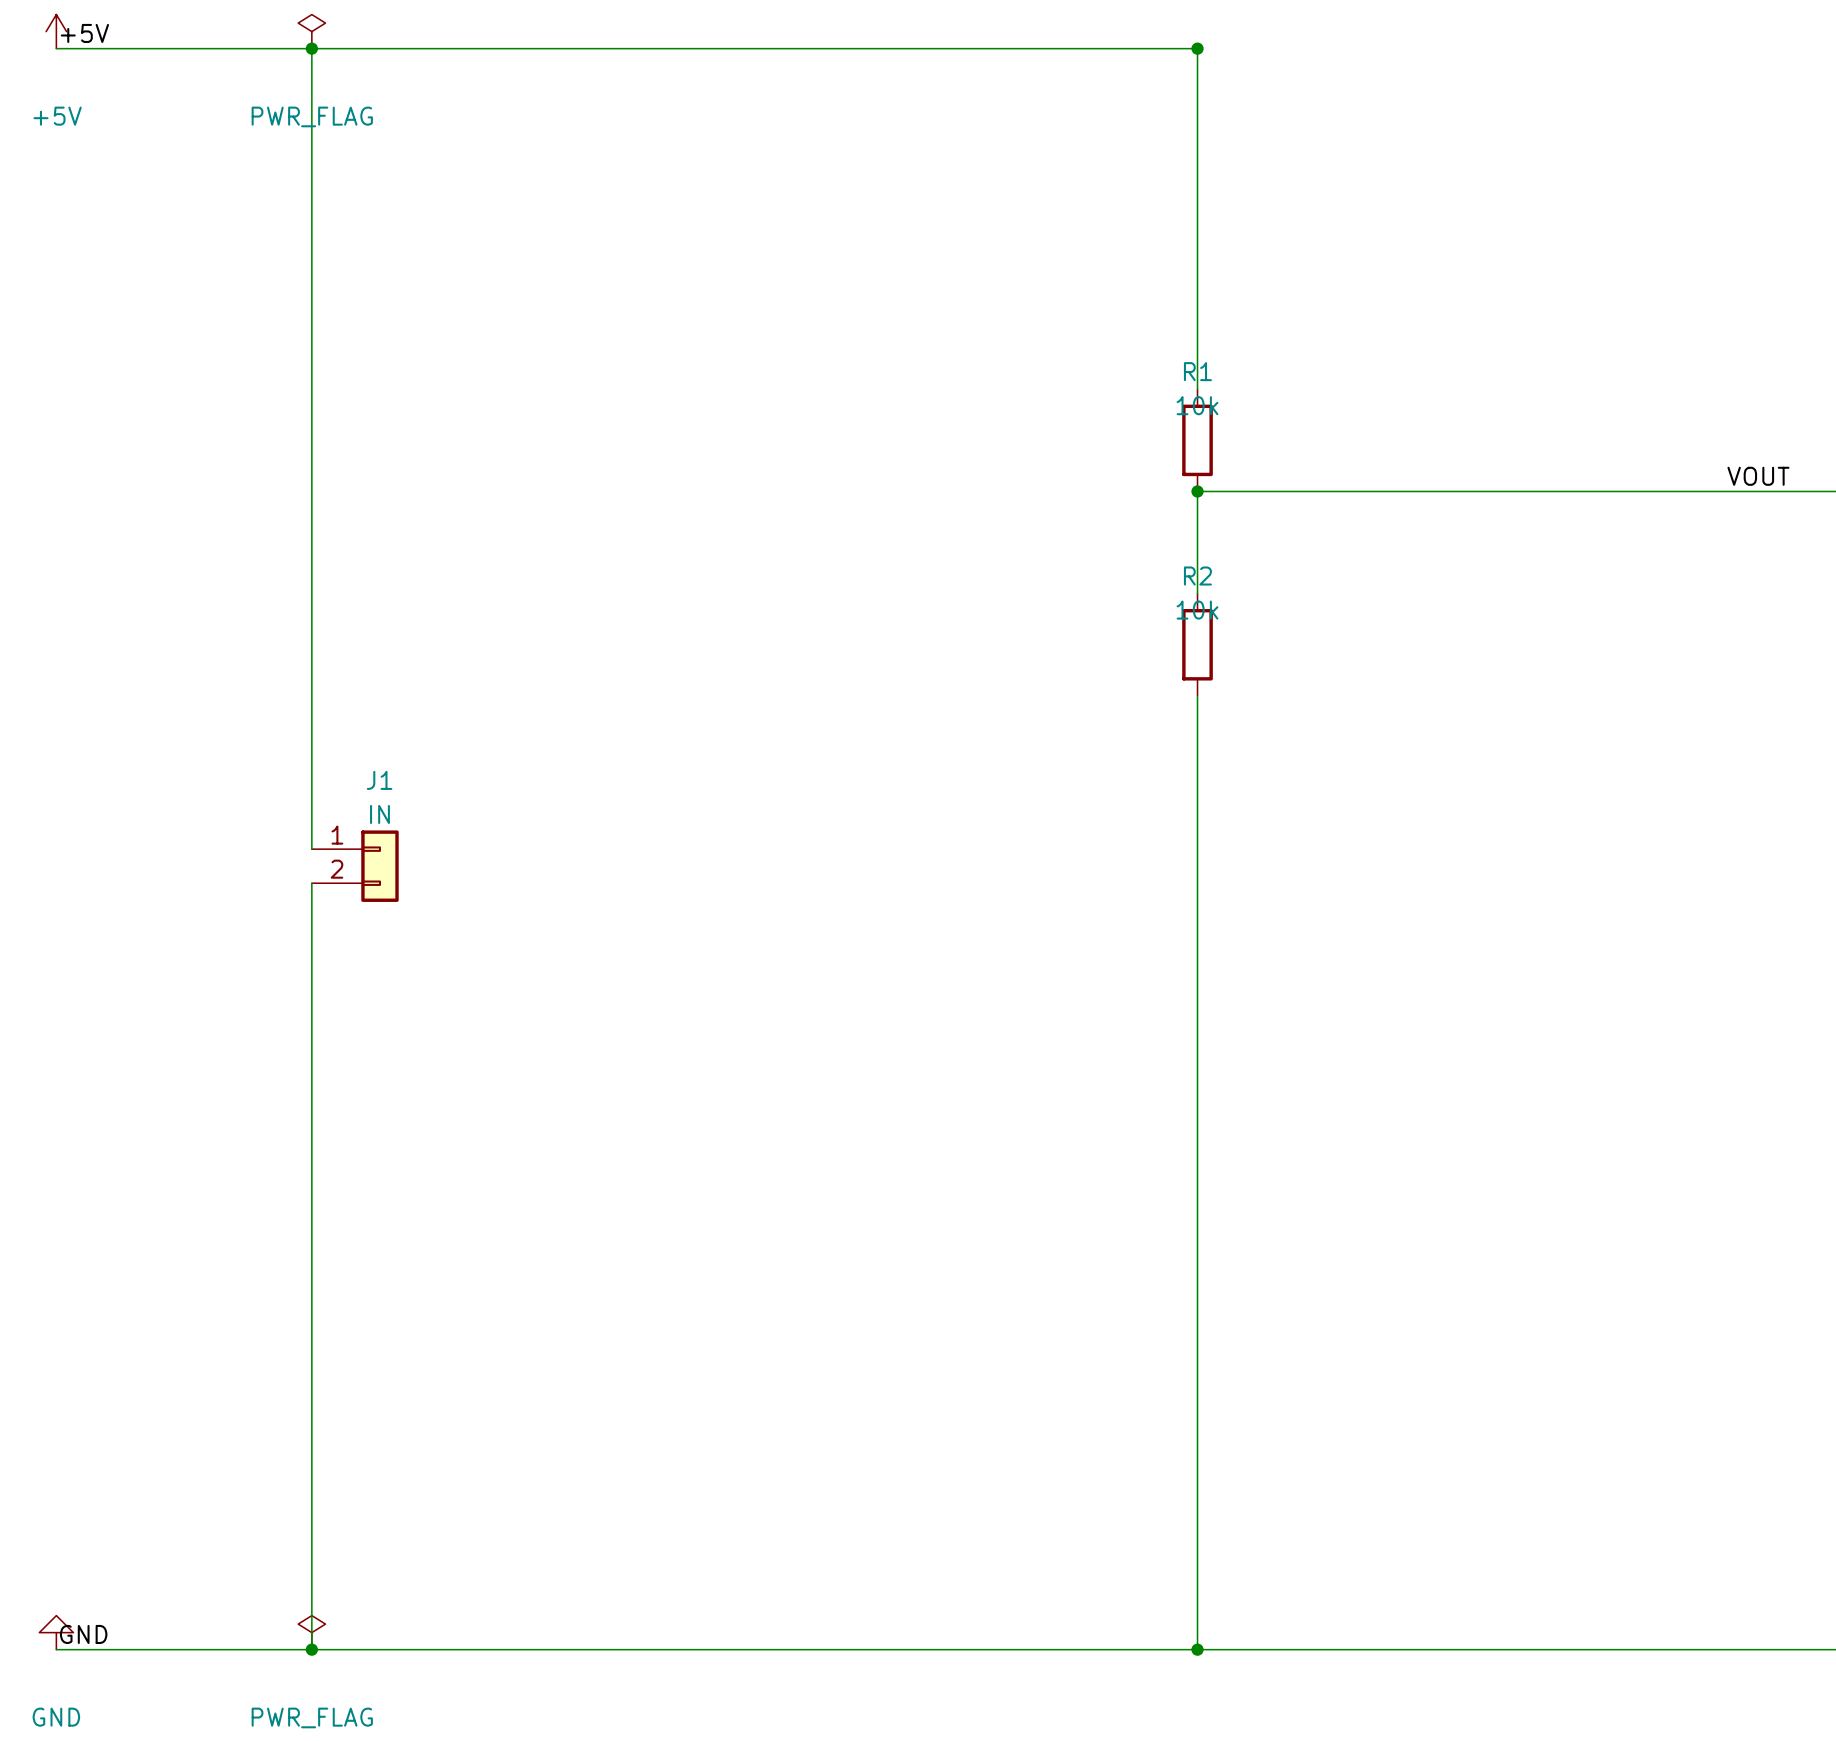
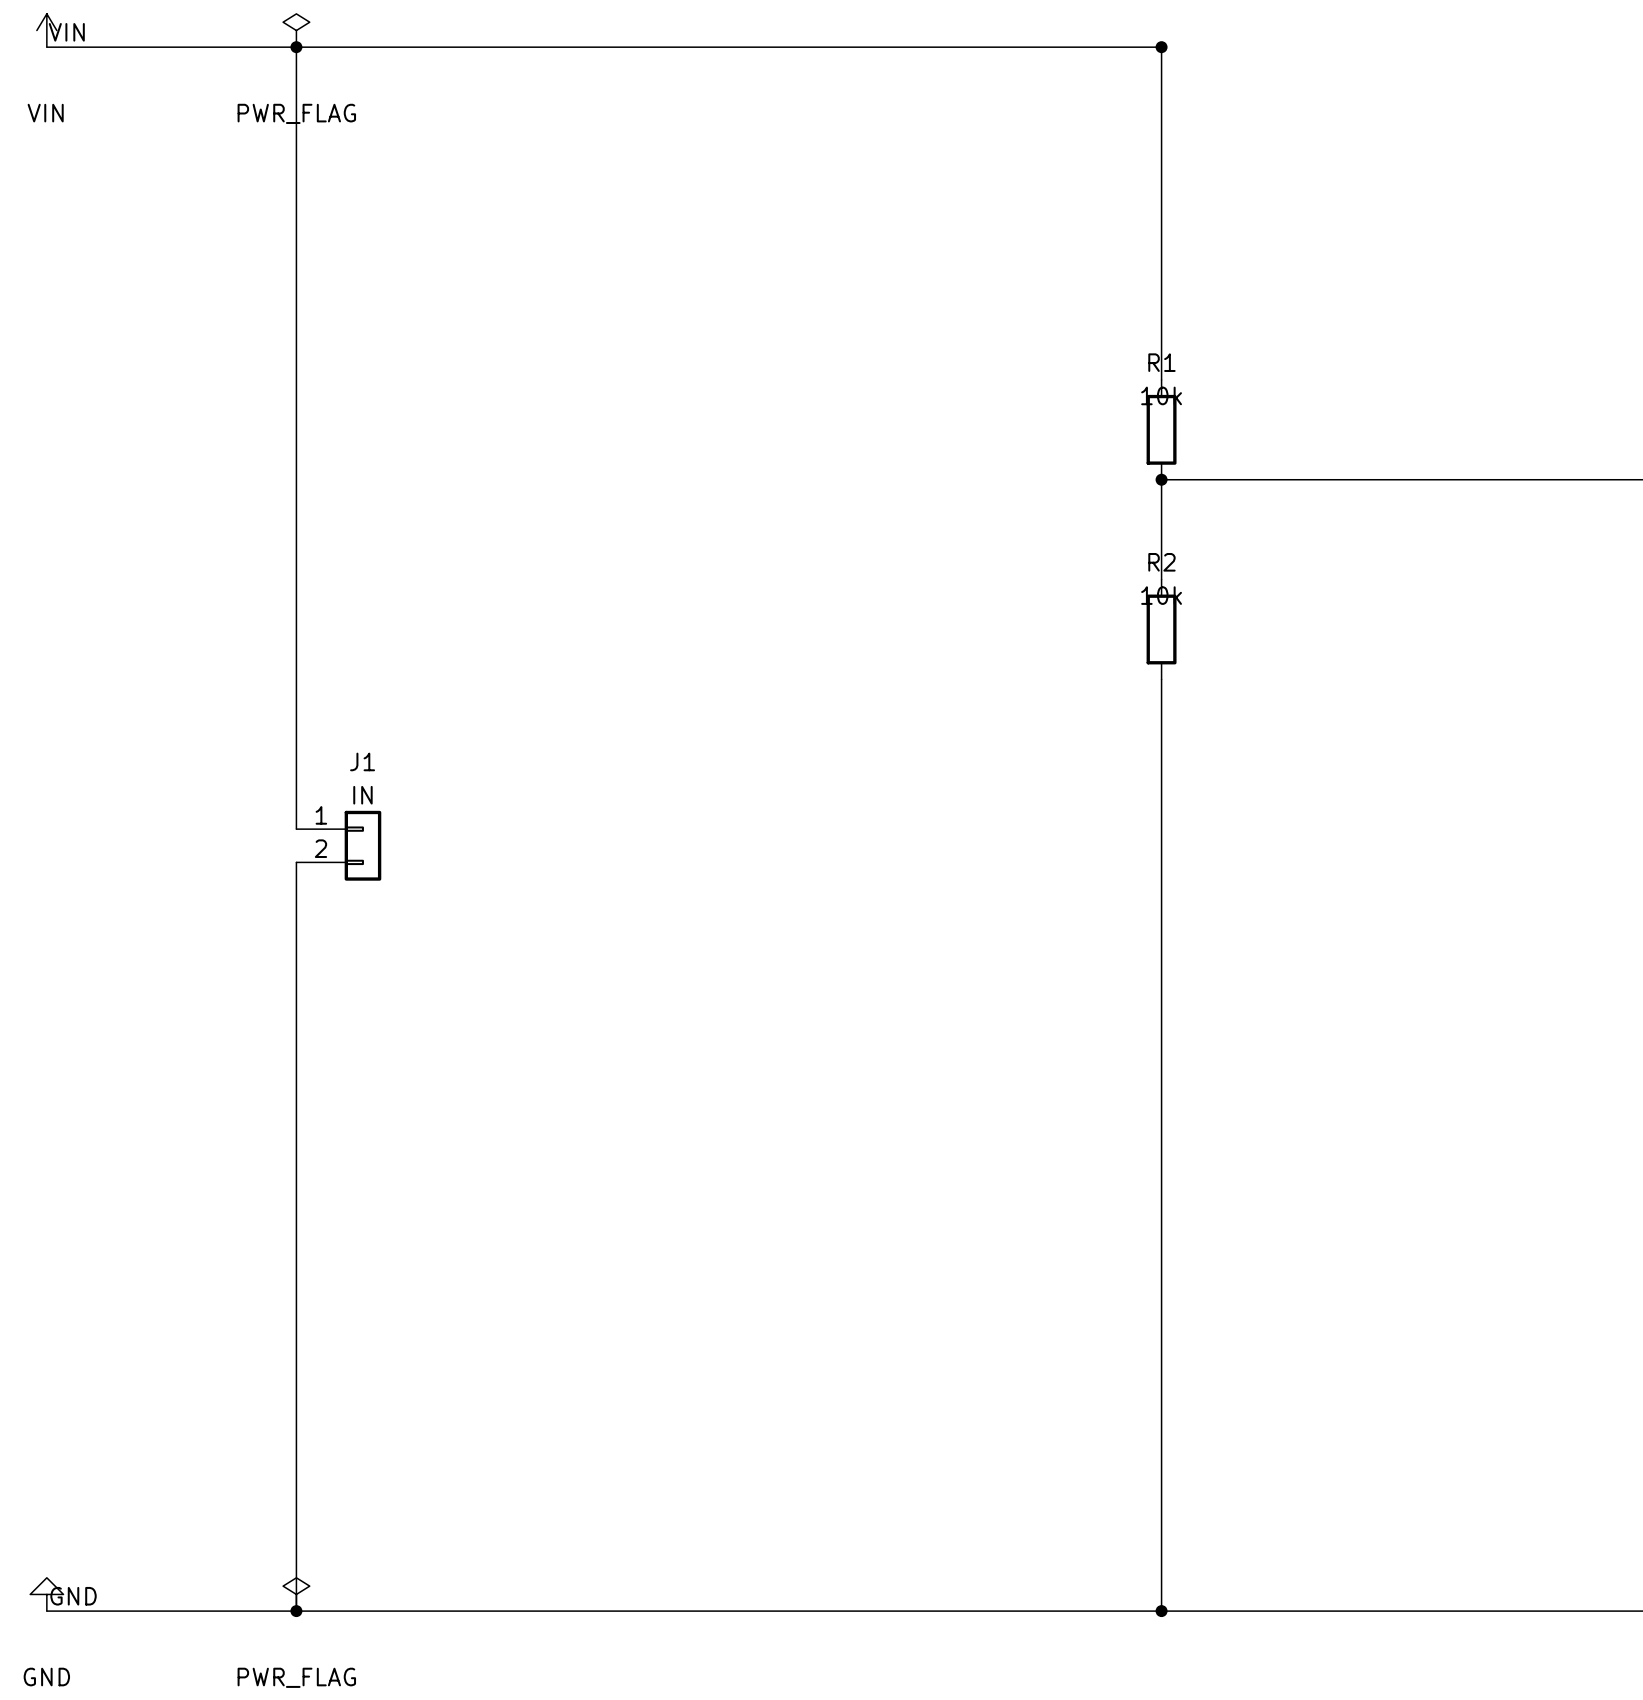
power symbol: +5V (56, 31) -> VIN (46, 30)
label: +5V (84, 33) -> VIN (66, 32)

